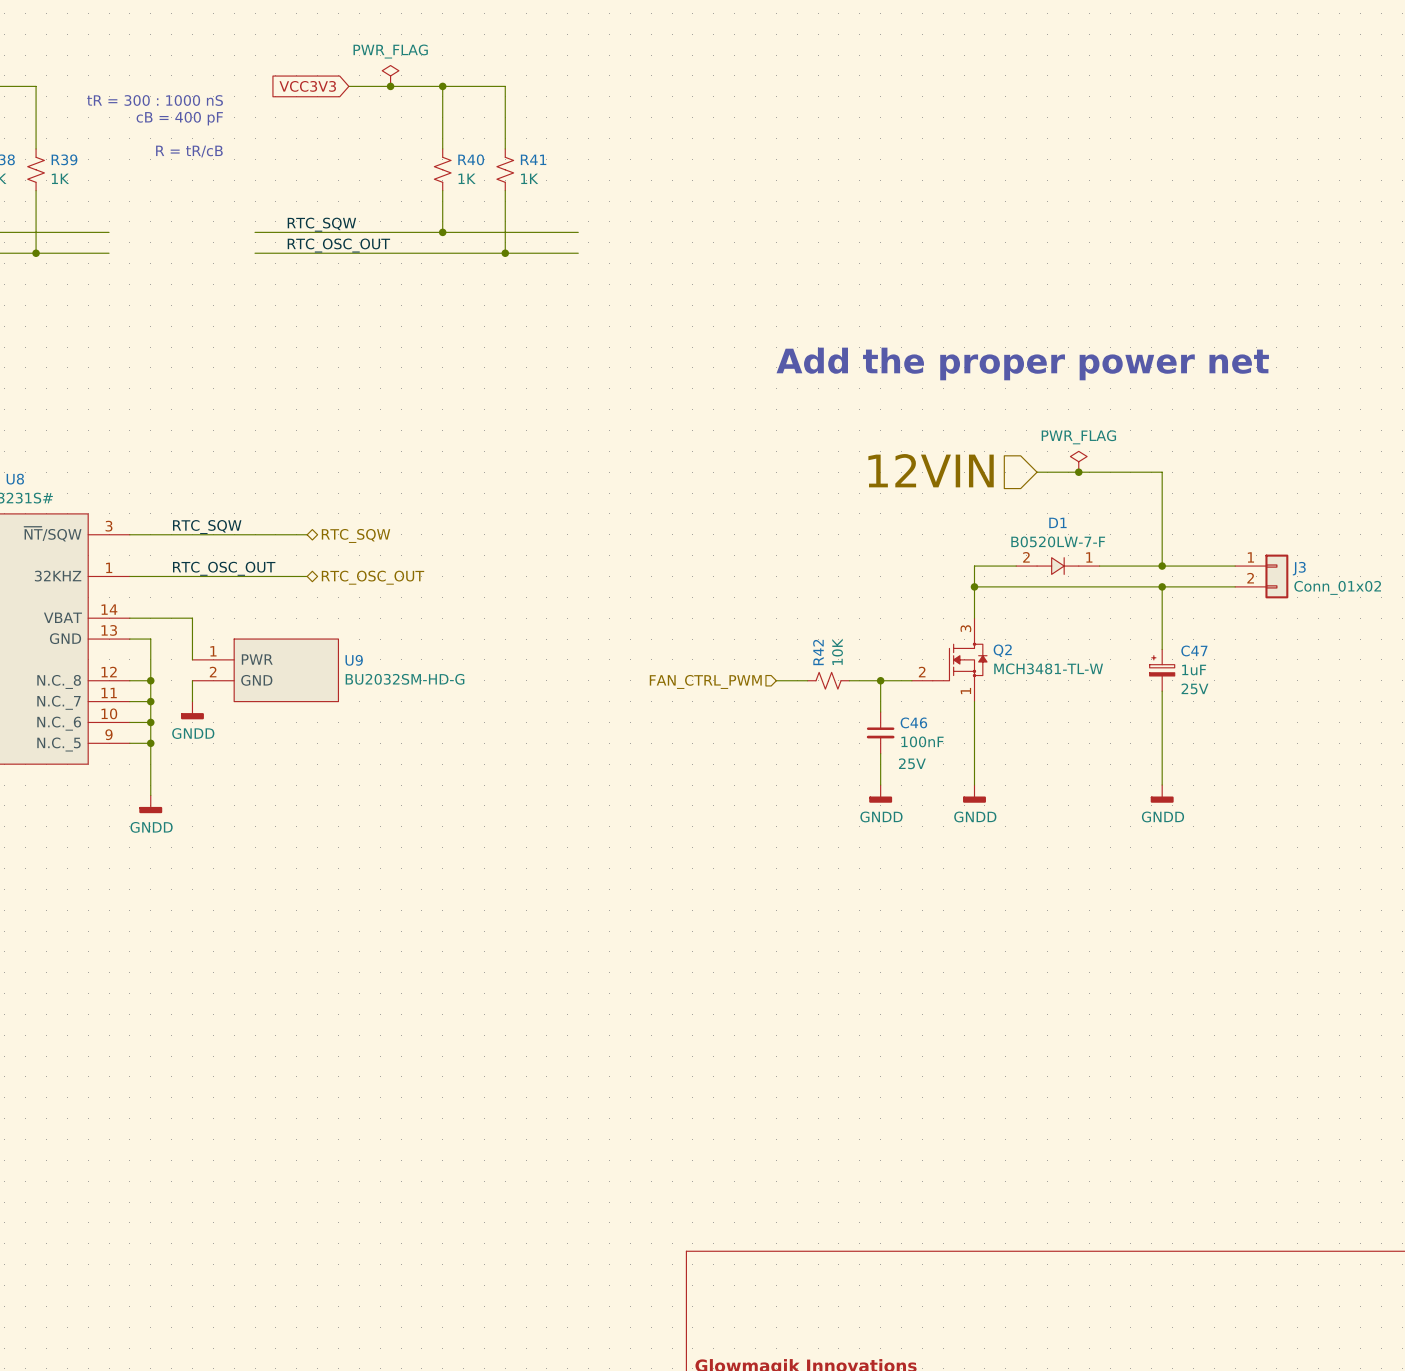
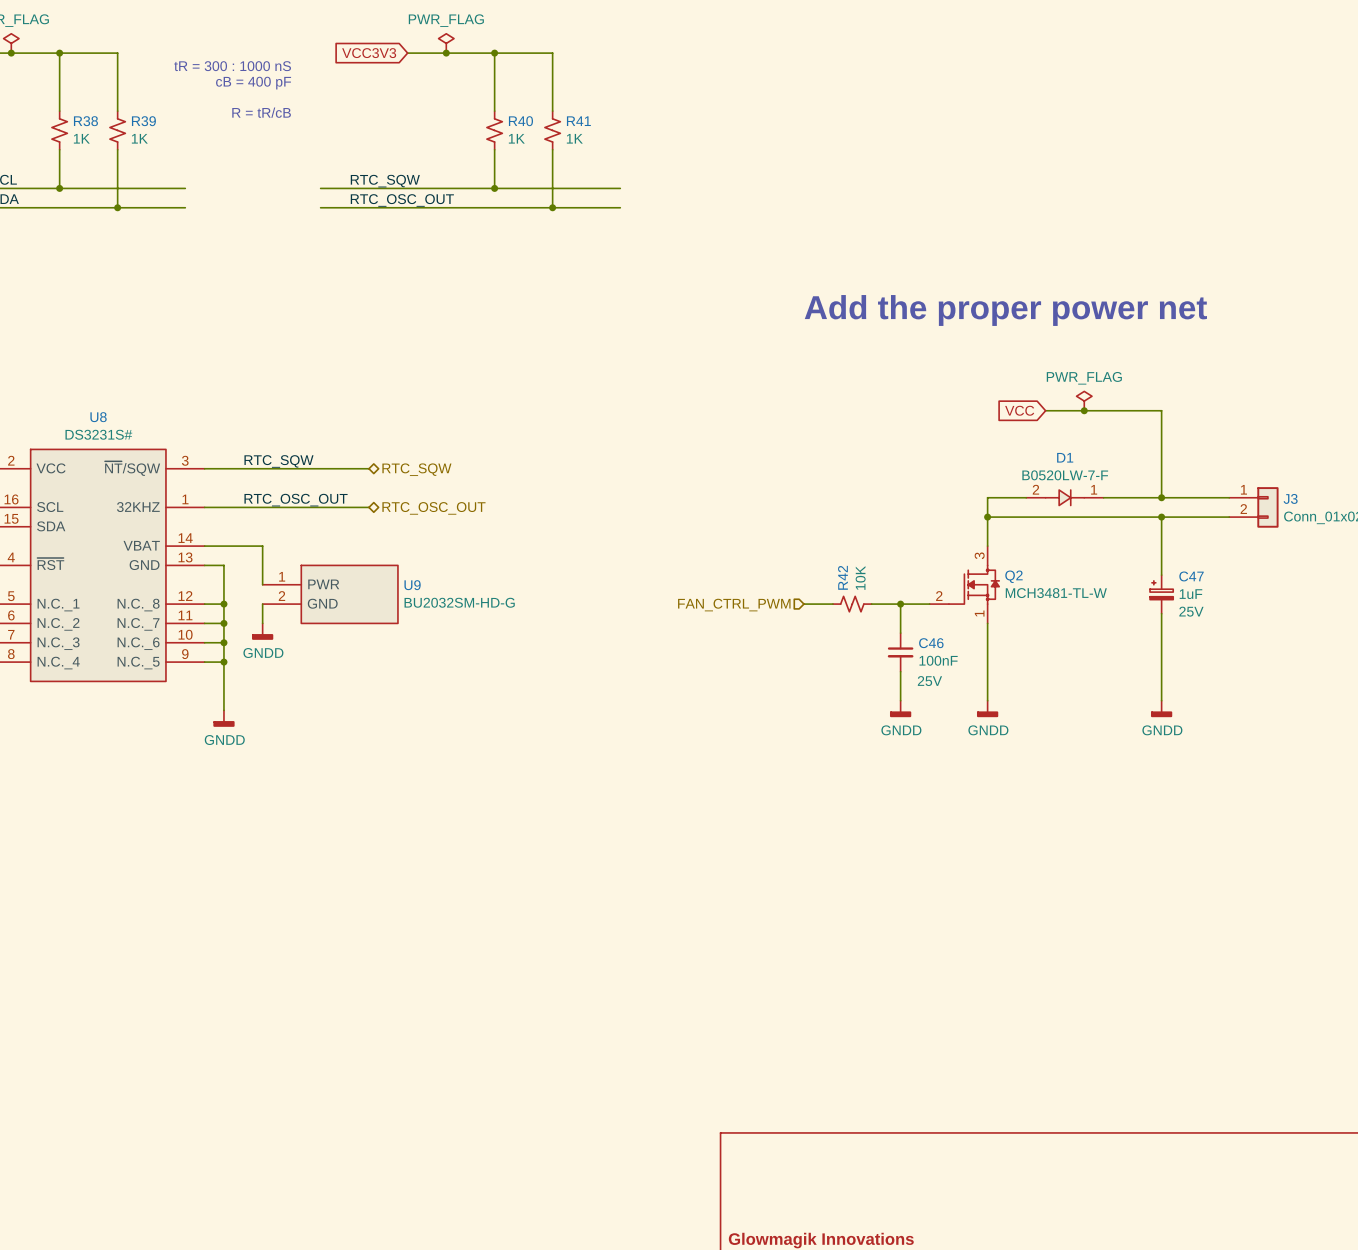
hierarchical label: 12VIN (931, 470) -> none
global label: none -> VCC (1019, 410)

